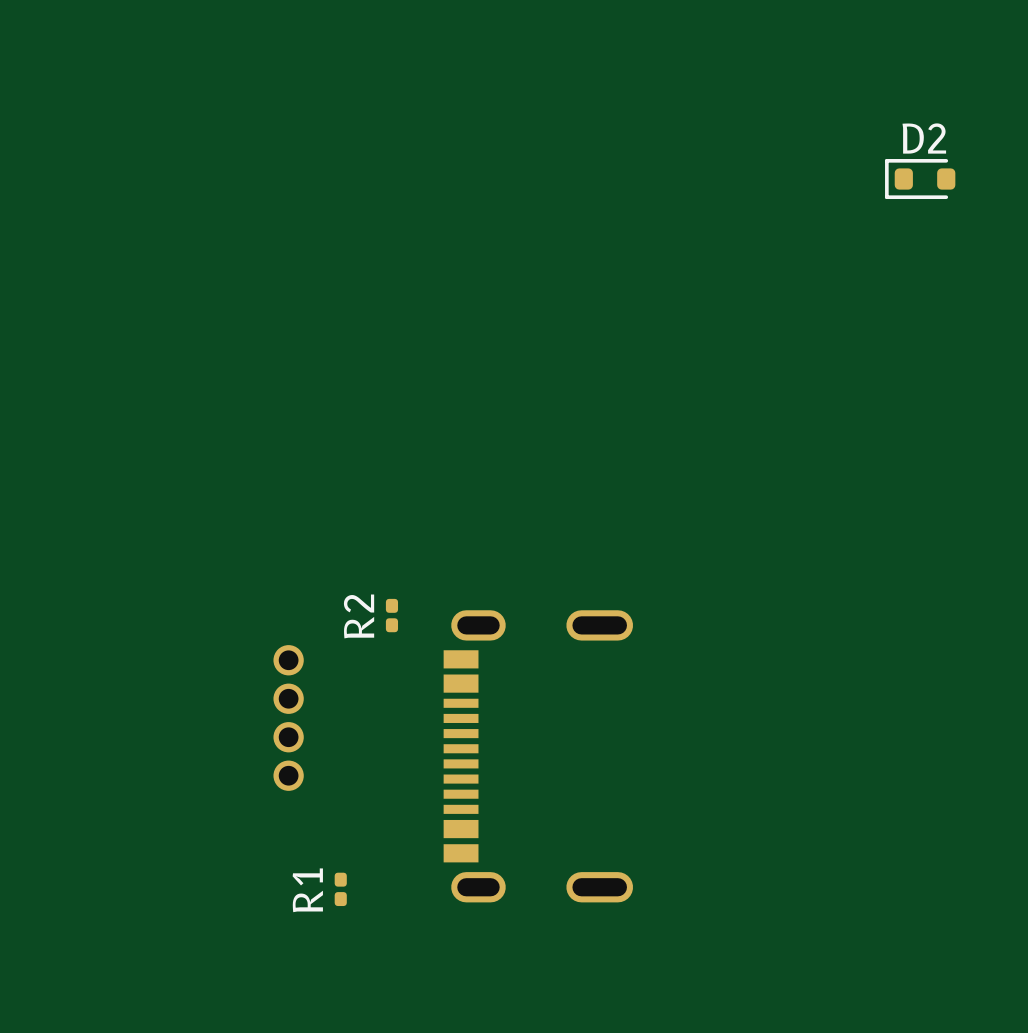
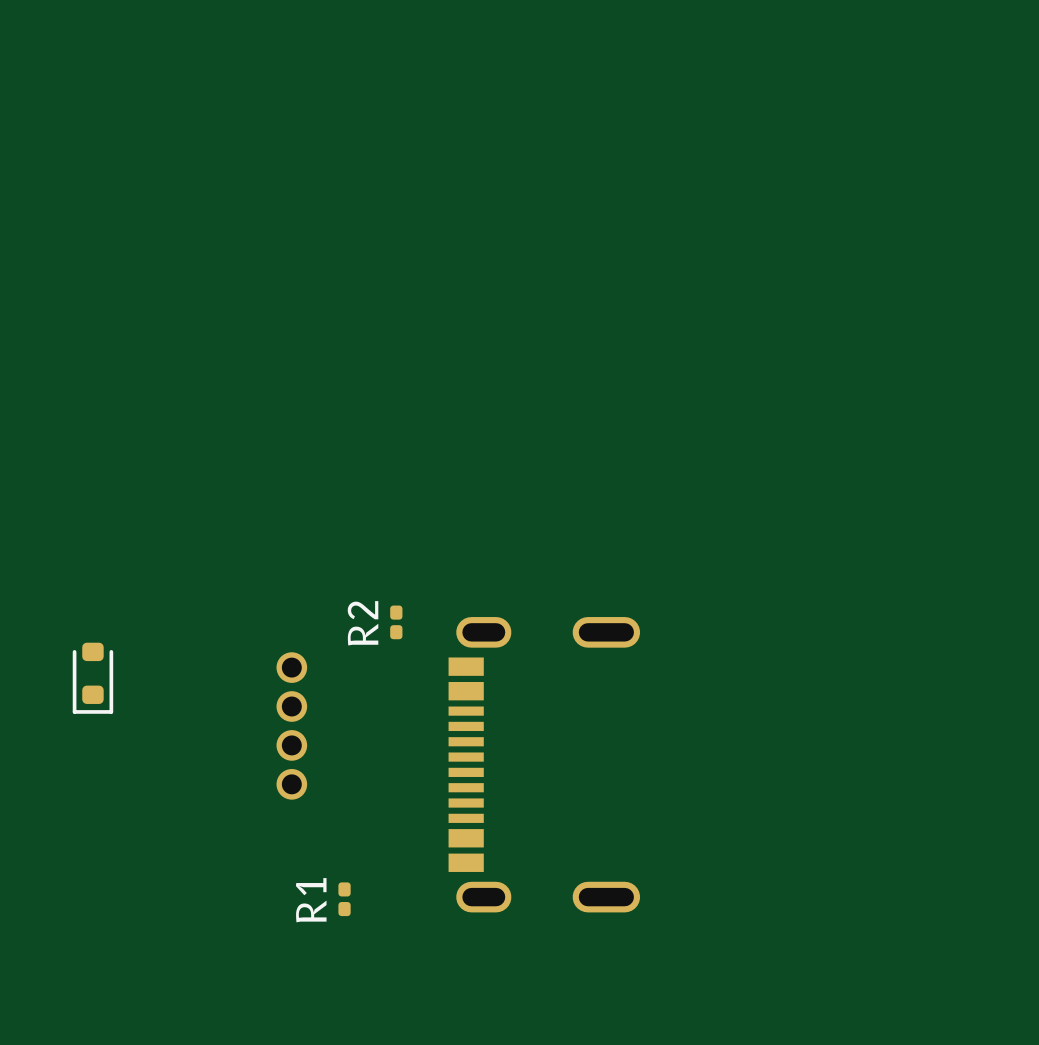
D2: (920, 179) -> none
part: none -> (92, 678)

